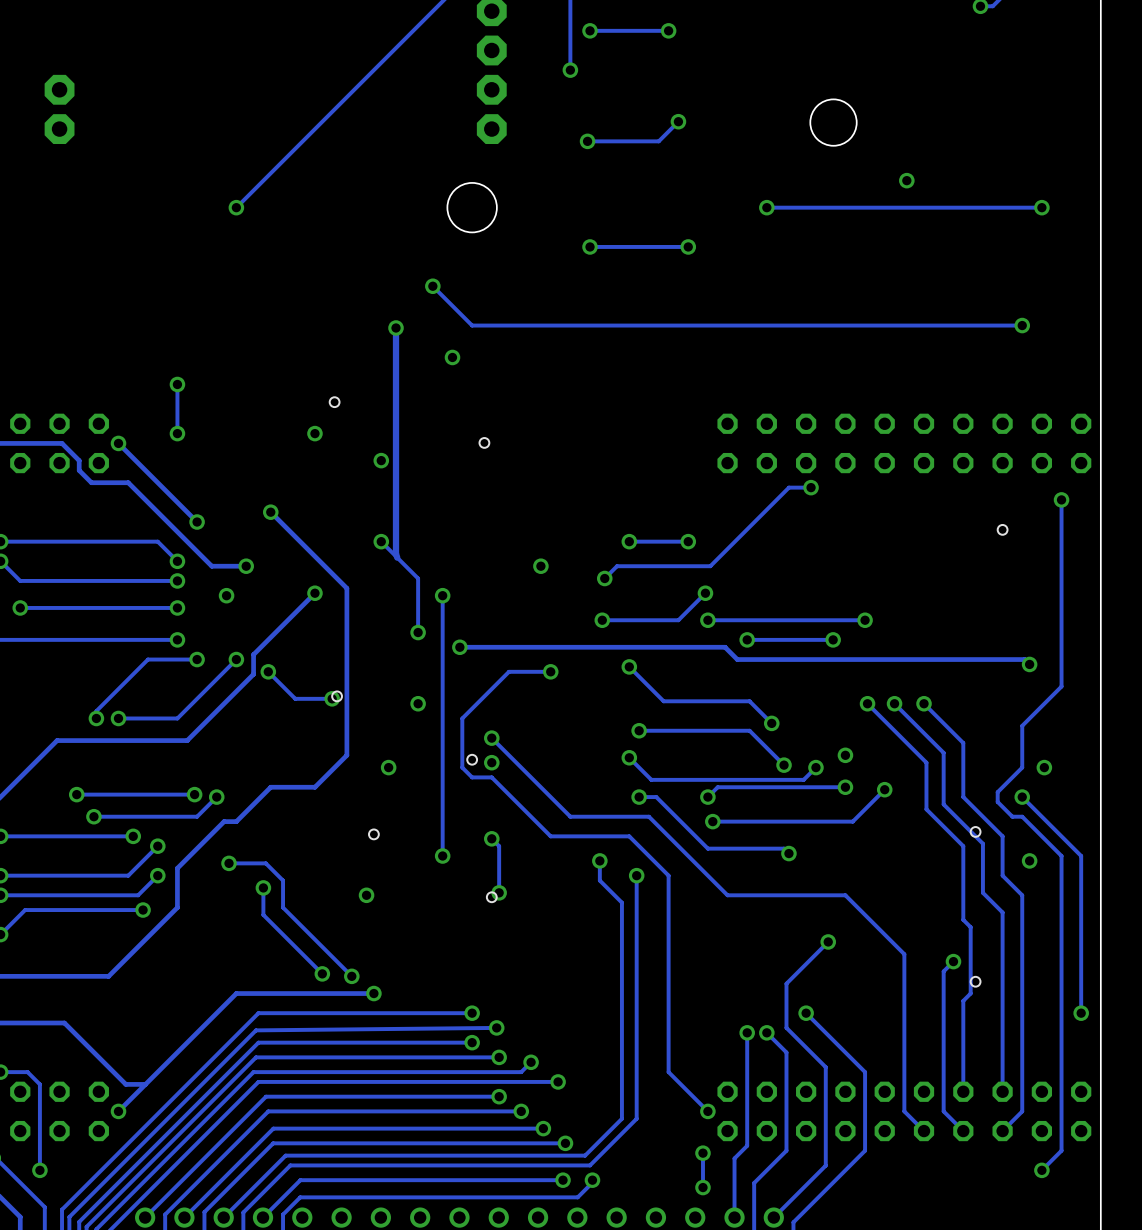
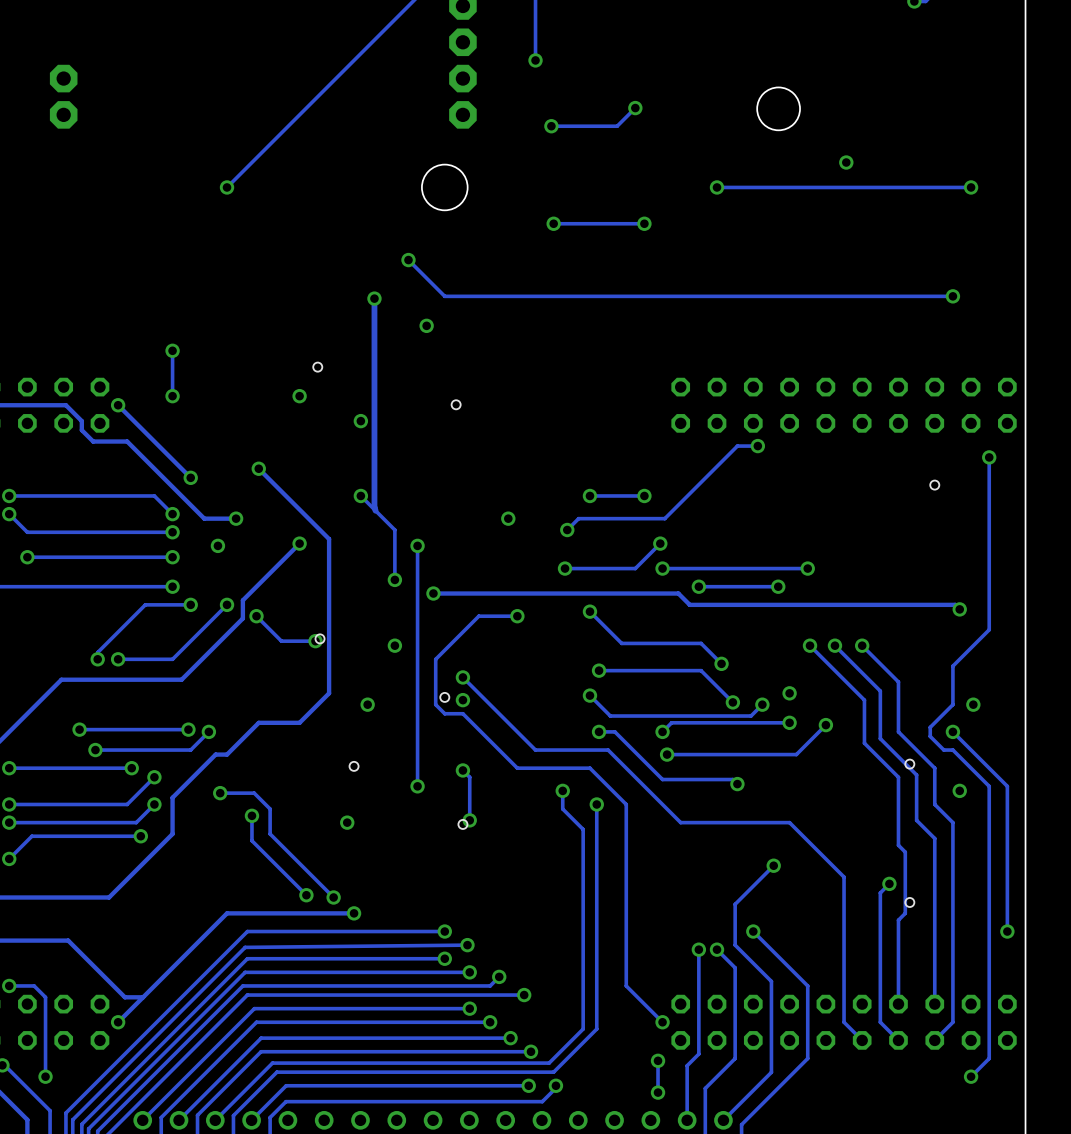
via: (590, 30) -> none
track: (668, 30) (590, 30) -> none
via: (668, 30) -> none

